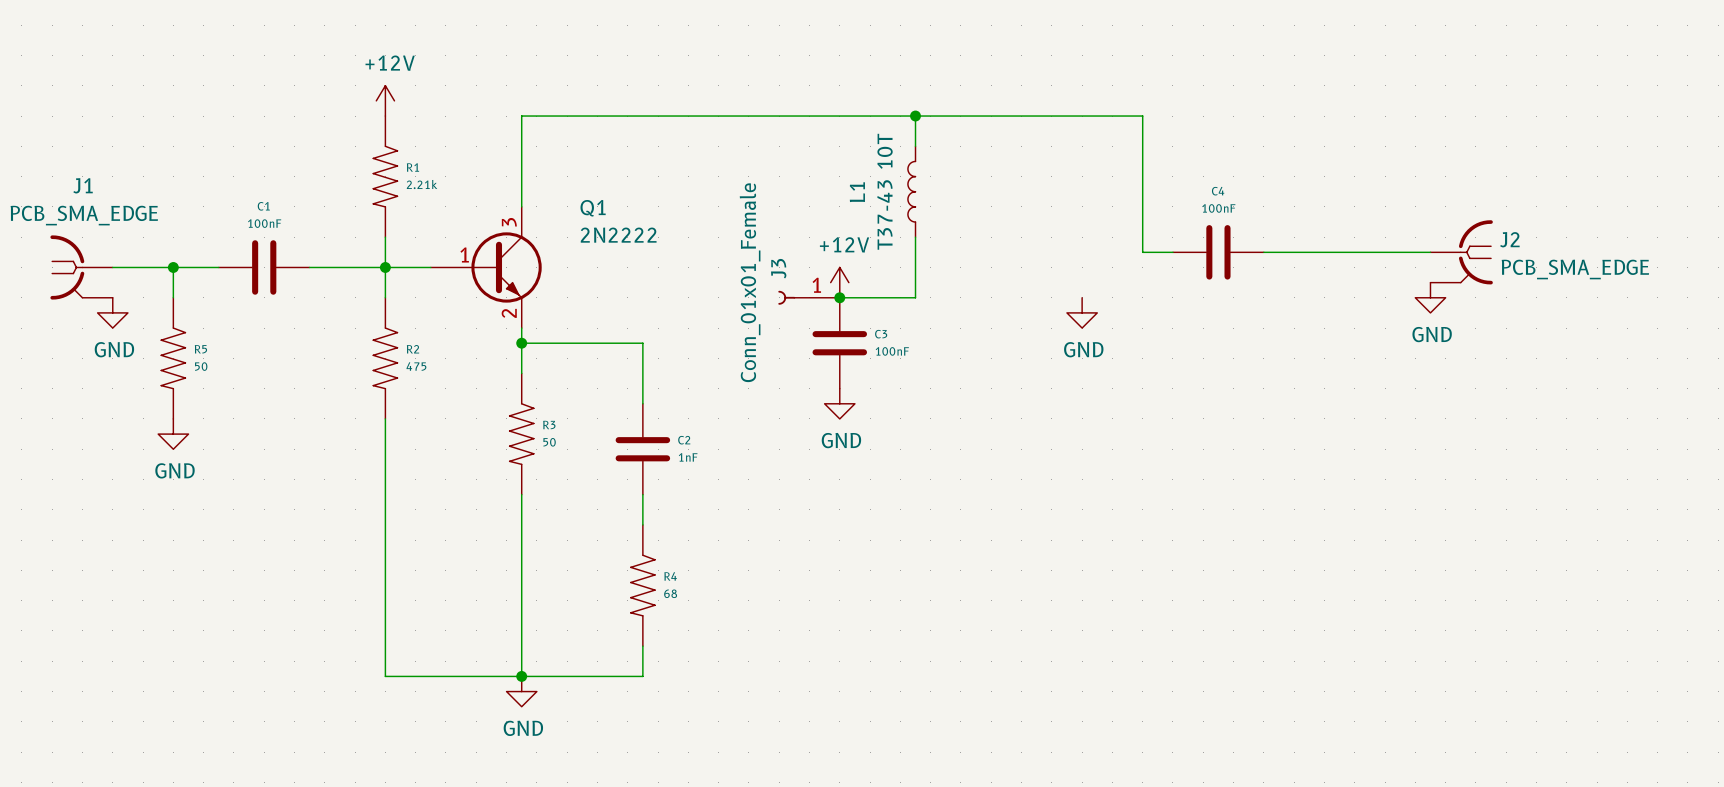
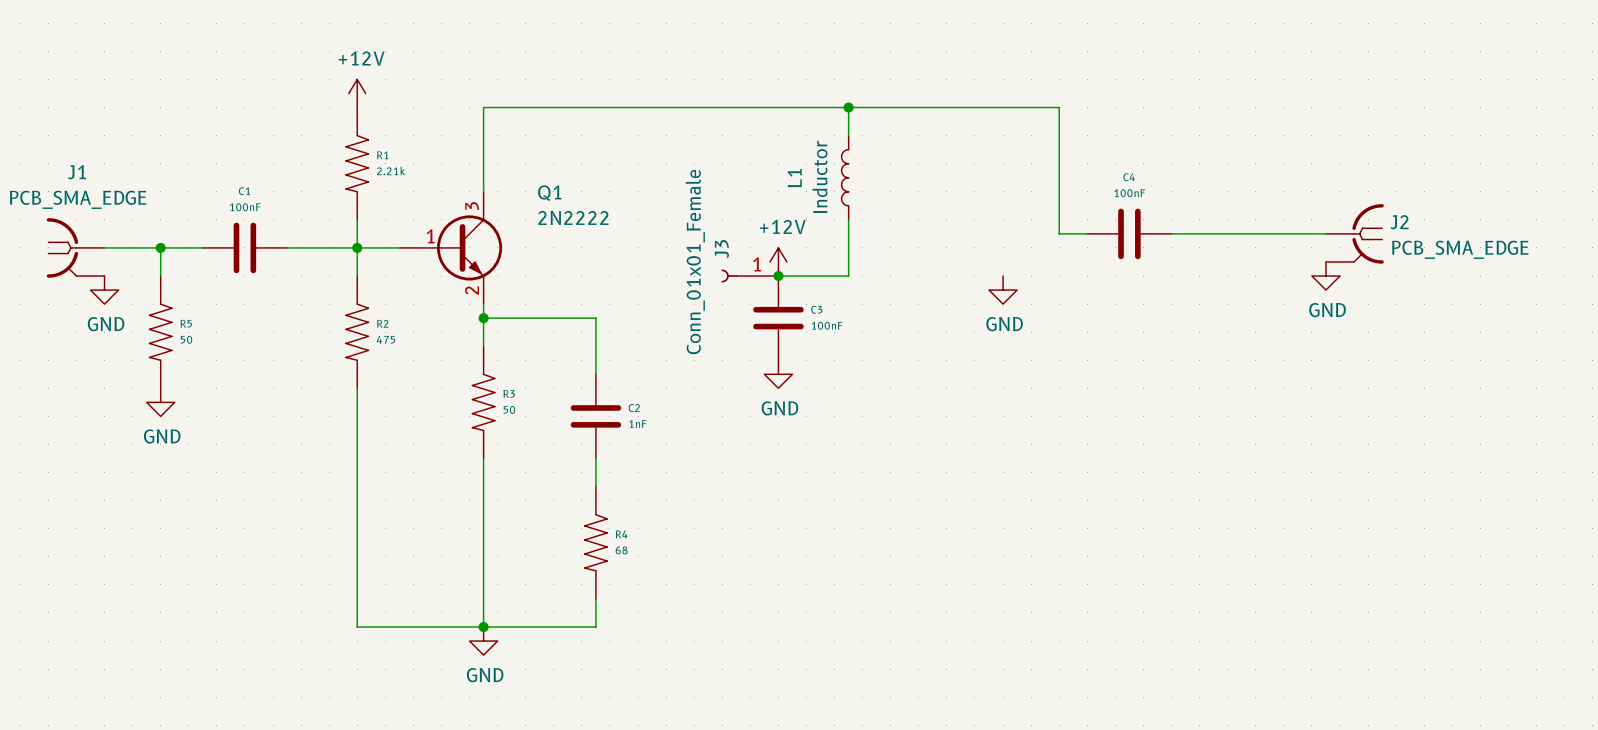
L1 value: T37-43 10T (885, 191) -> Inductor (819, 177)

